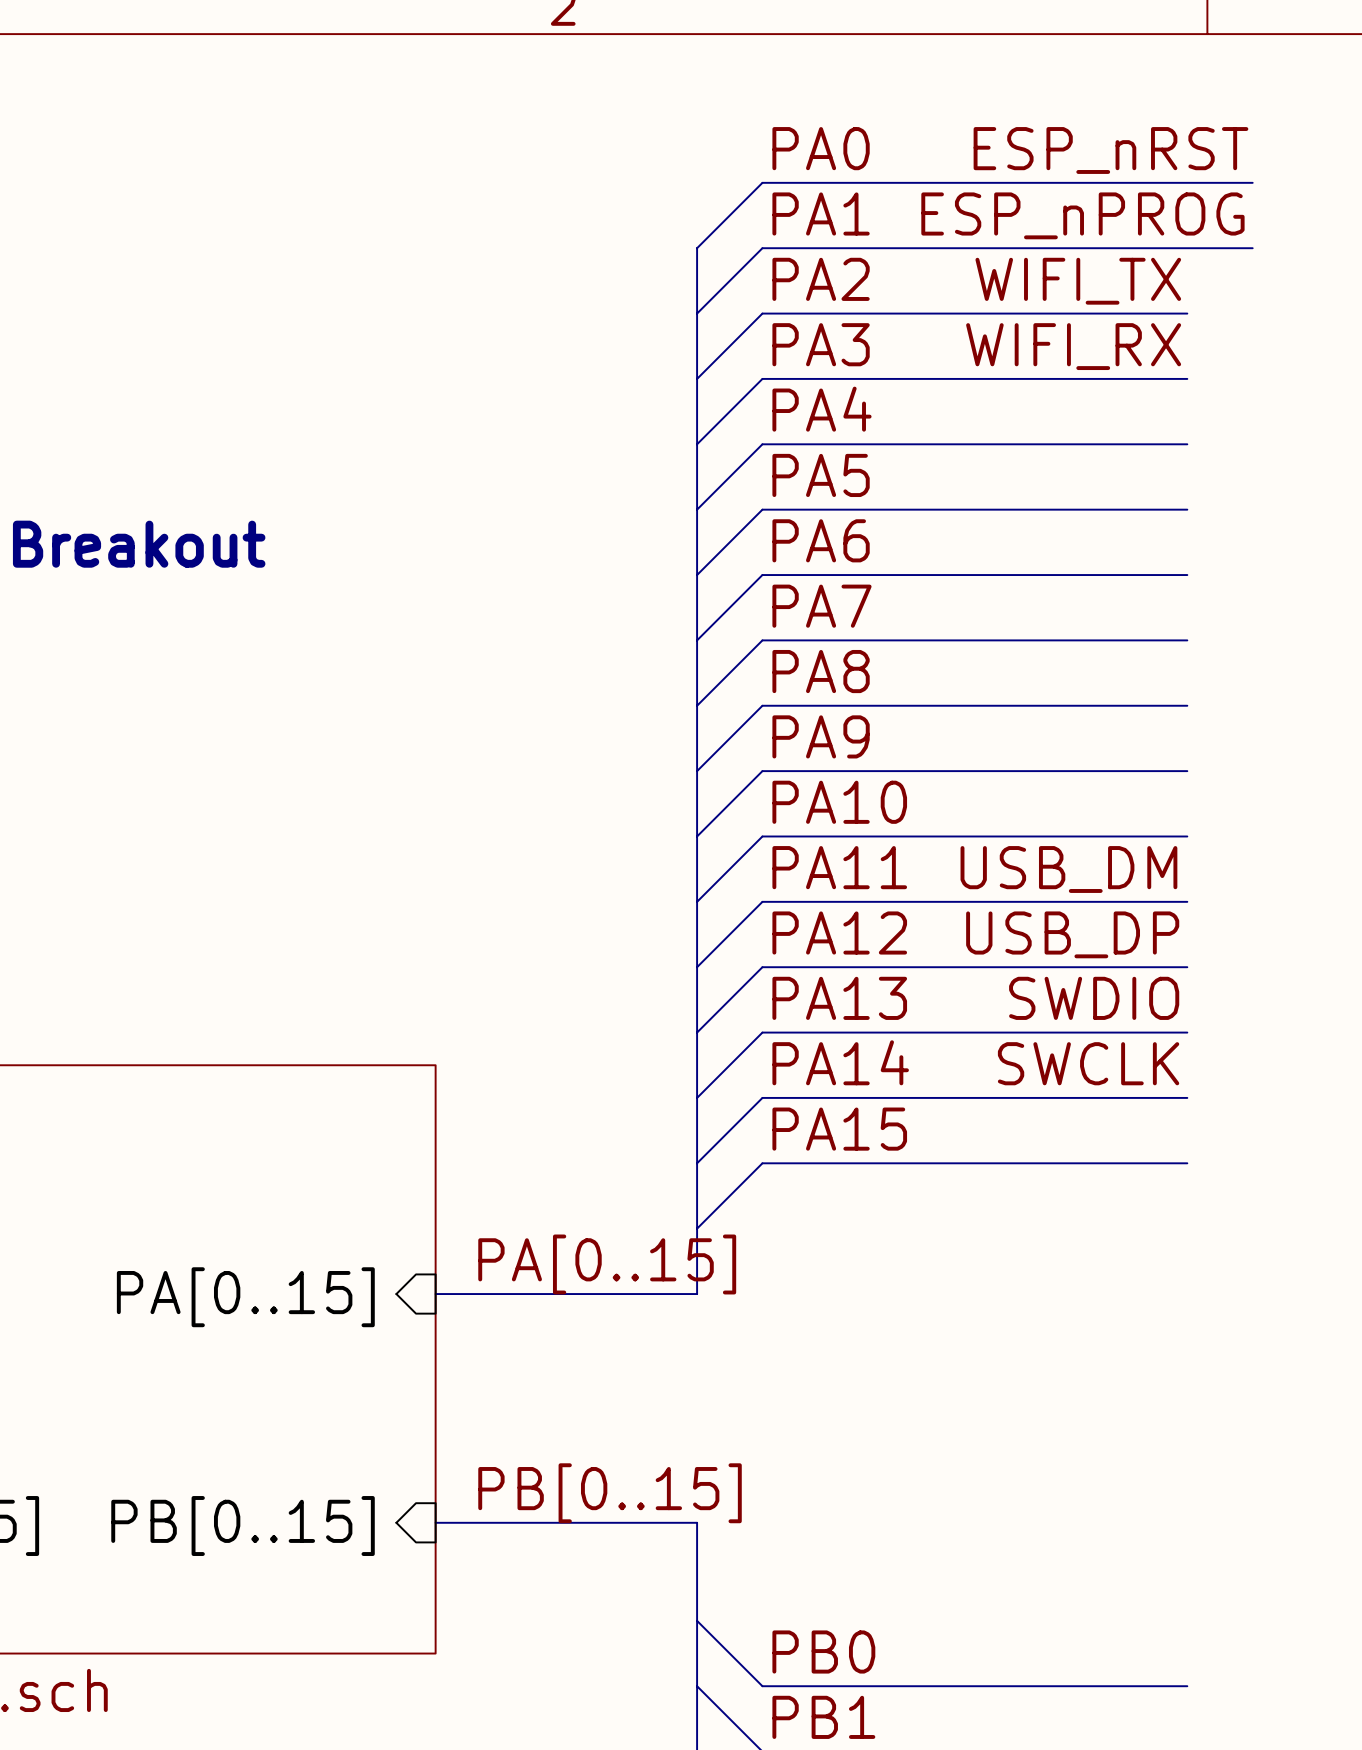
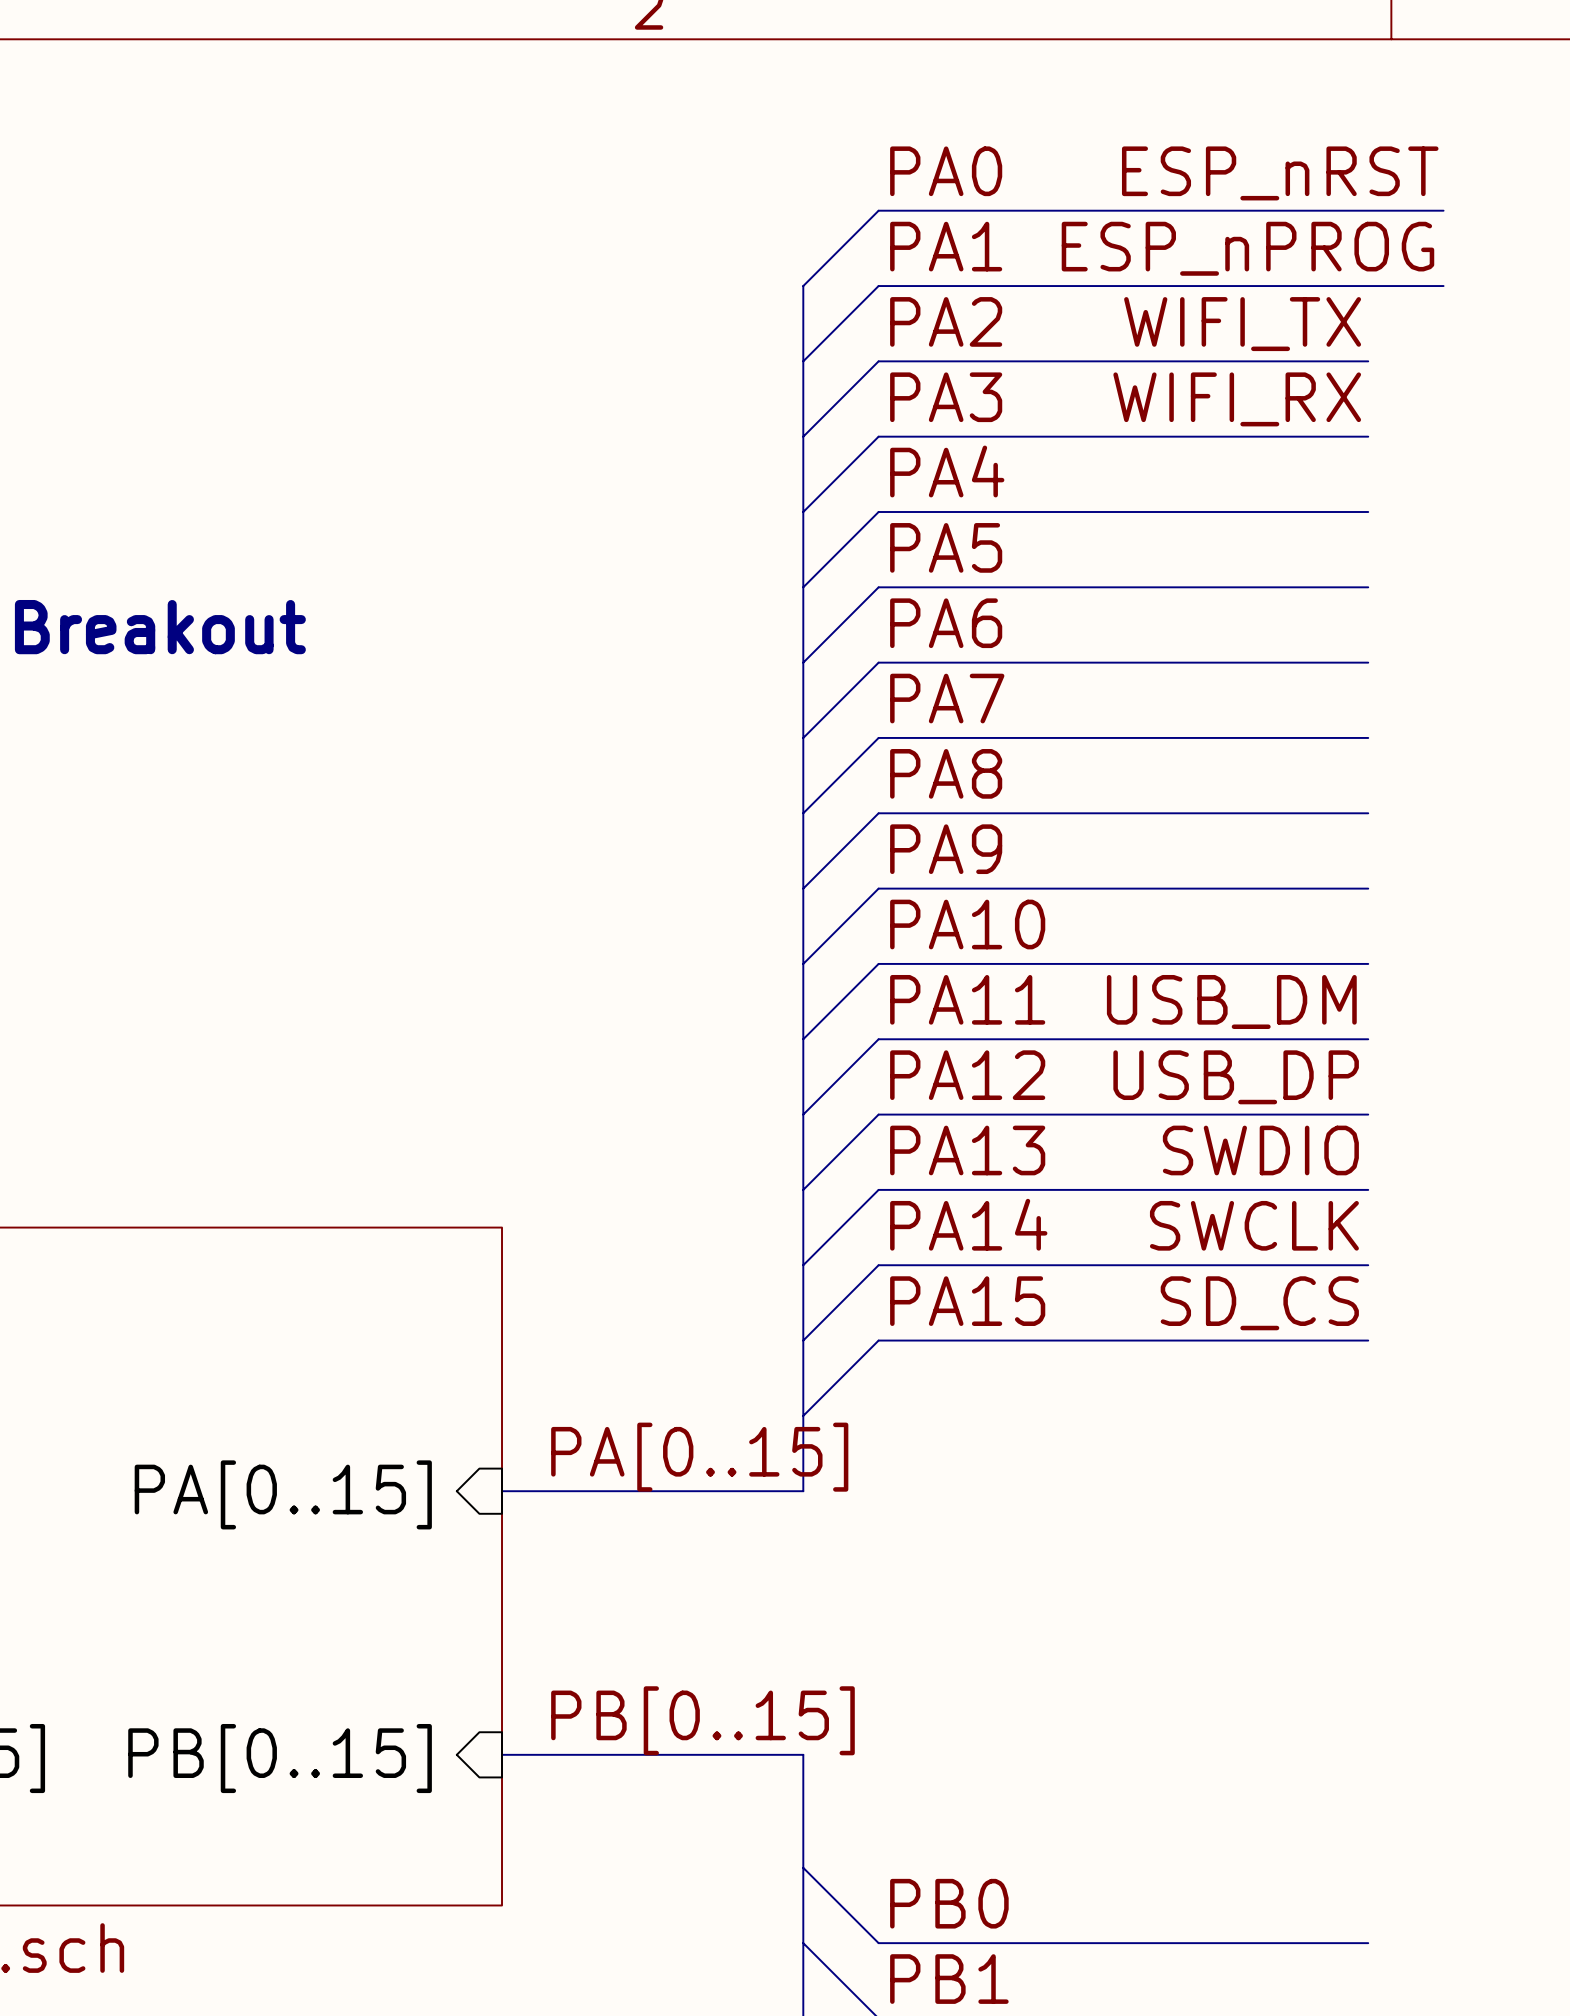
label: none -> SD_CS (1259, 1303)

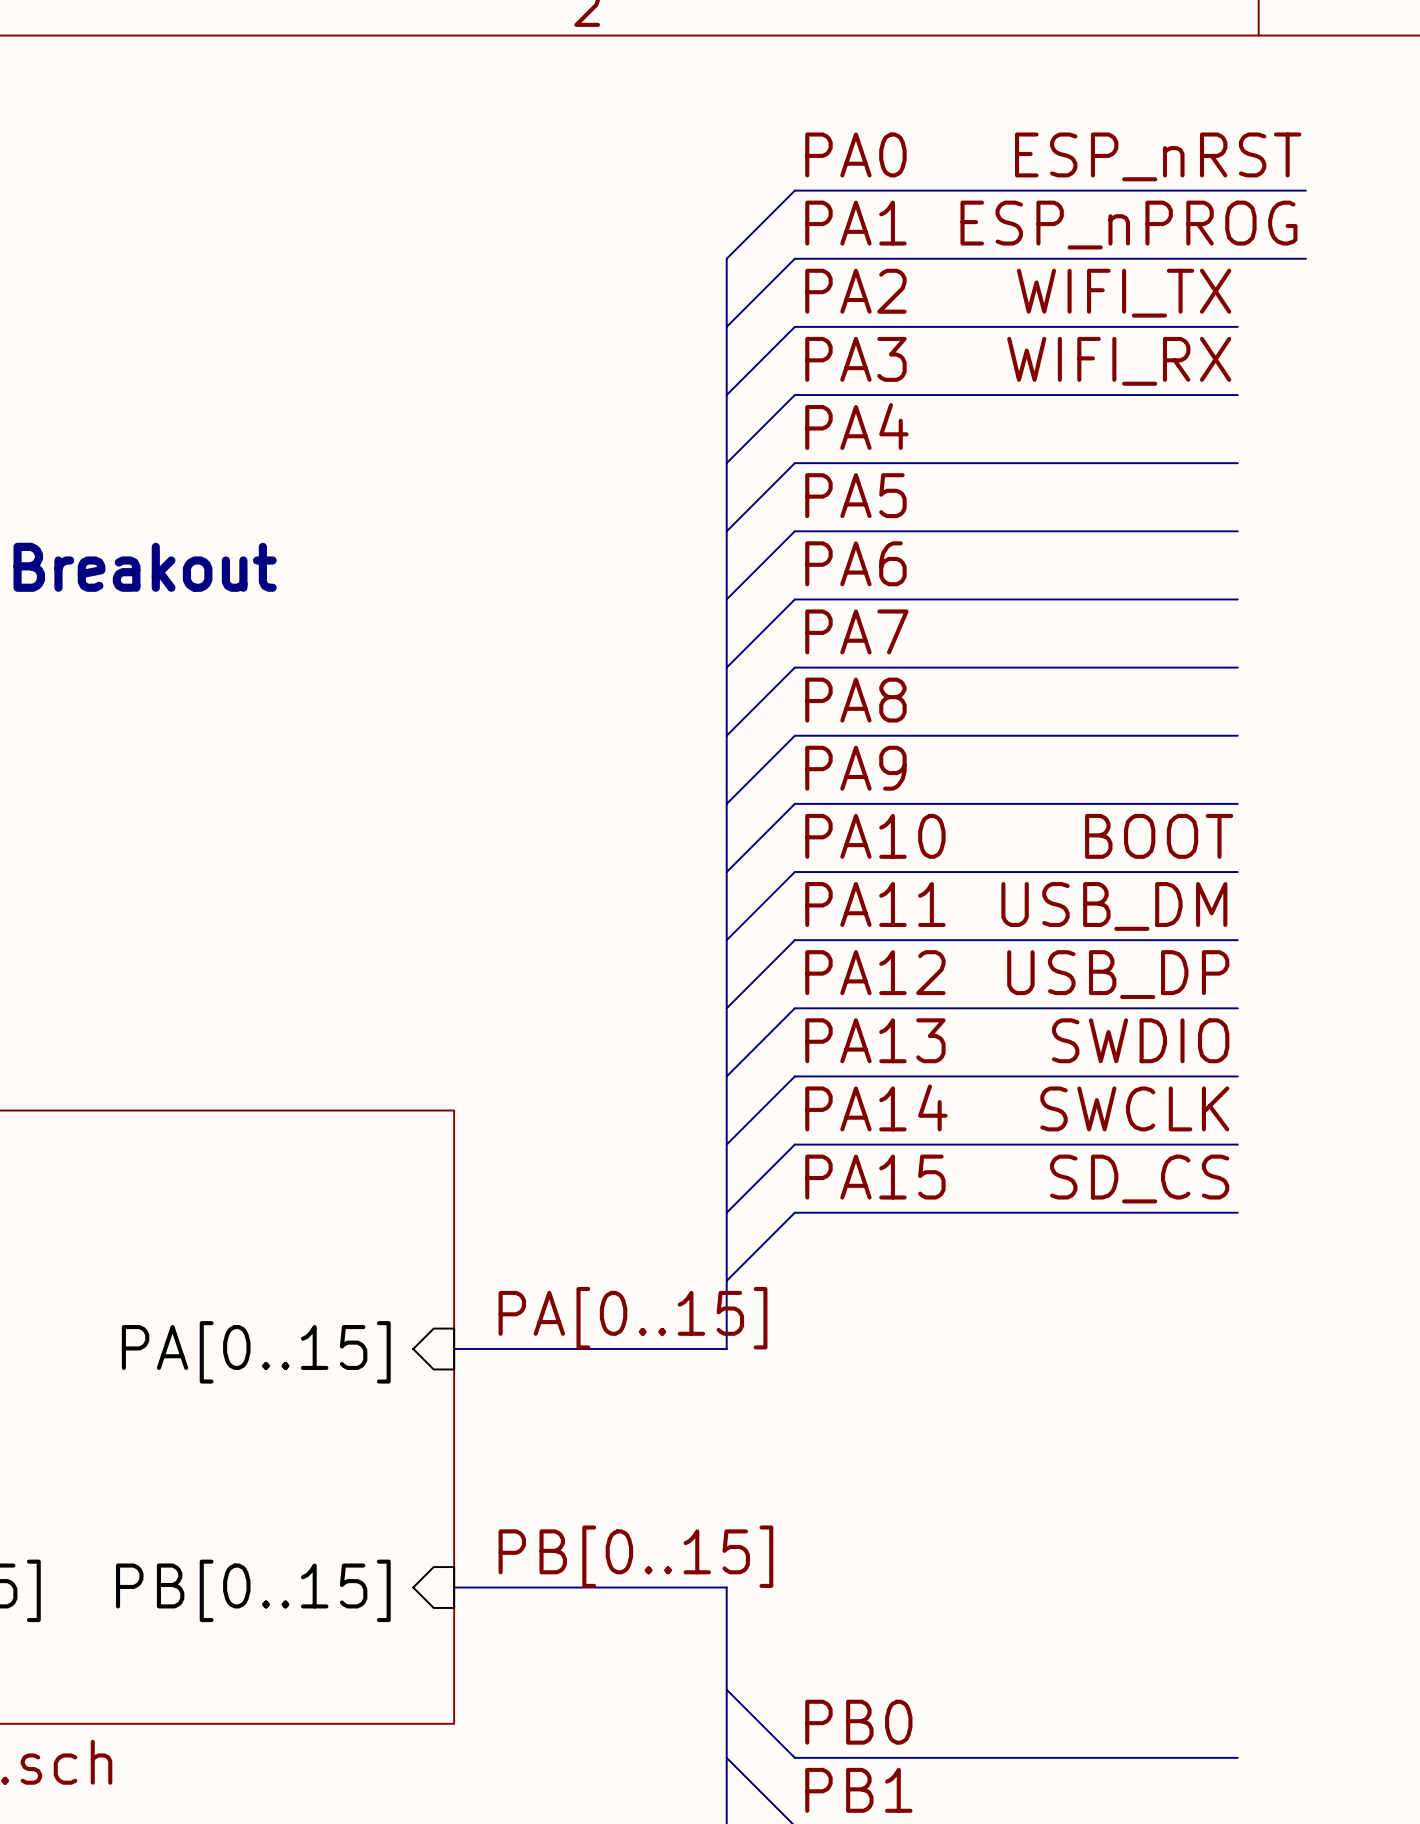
label: none -> BOOT (1159, 836)

